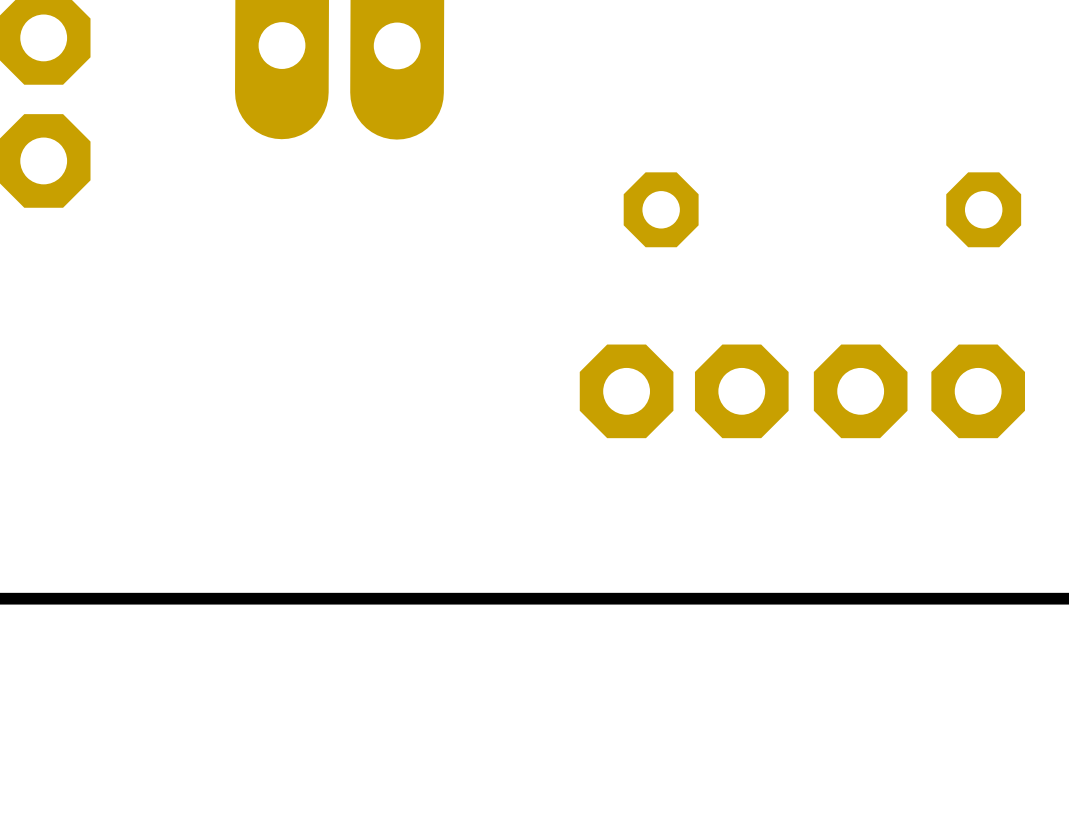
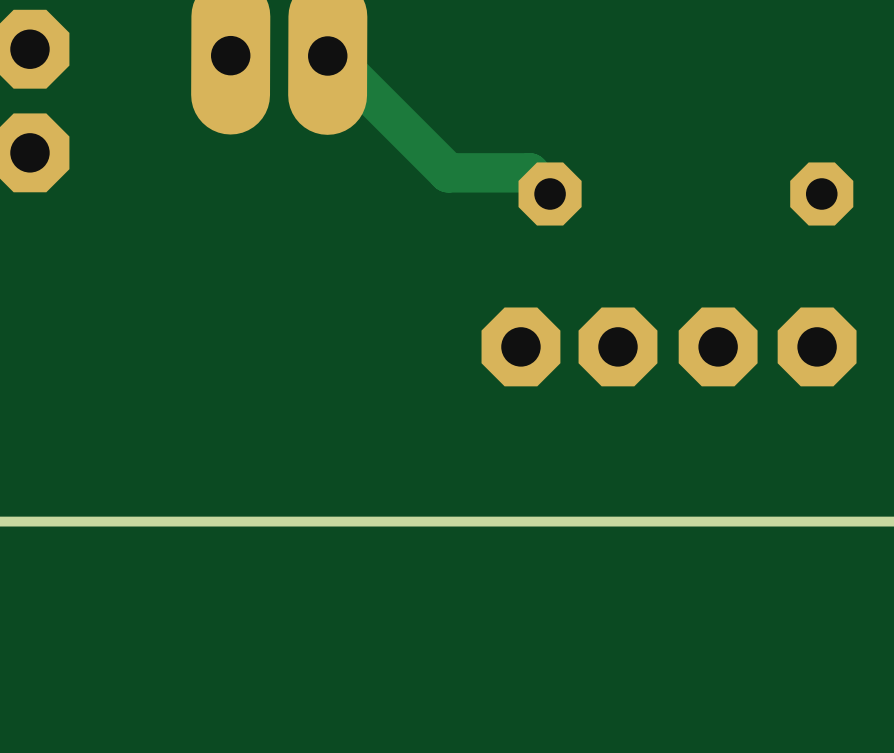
track: none -> (327, 55) (339, 64) (448, 172) (529, 172) (550, 193)

